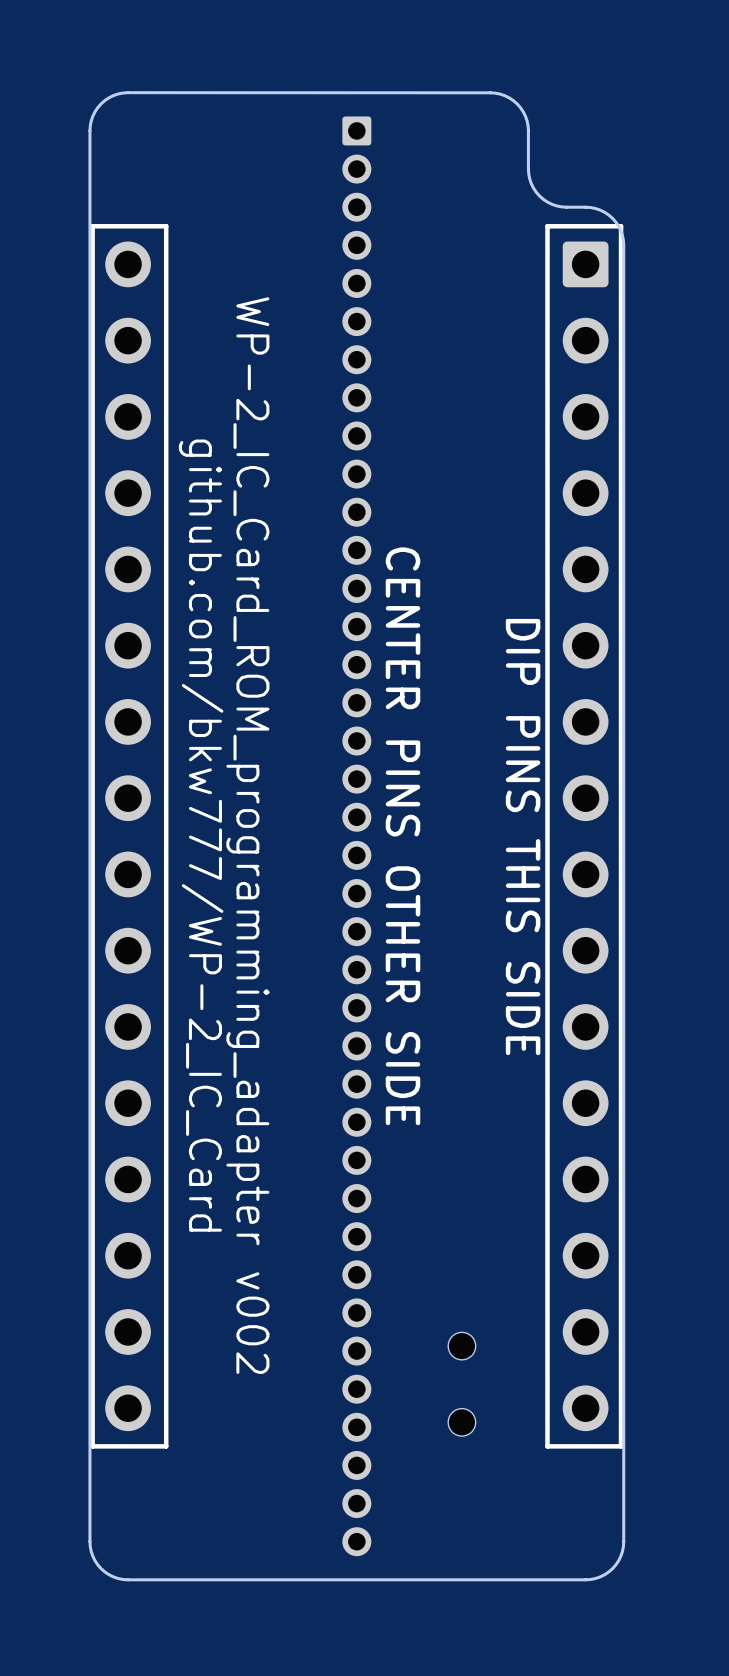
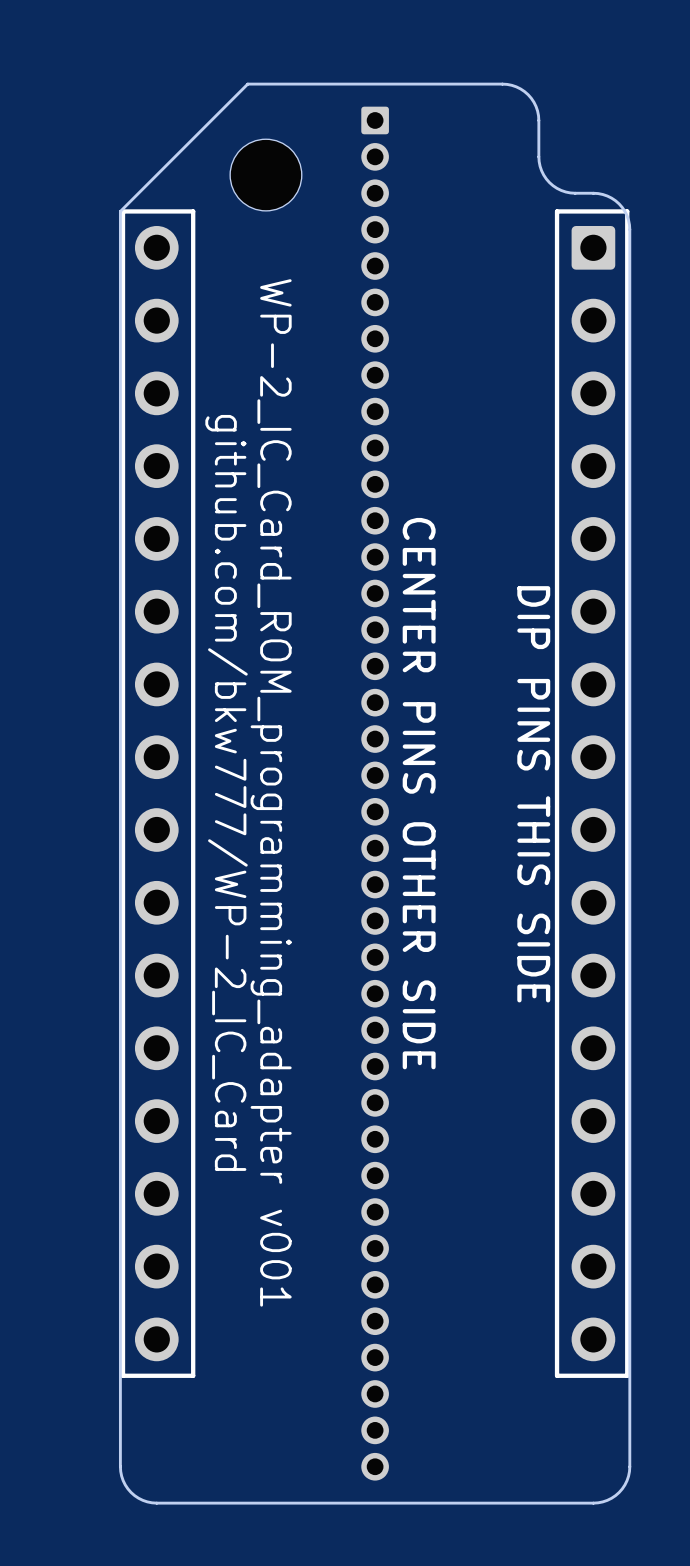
board edge: (128, 92) (490, 92) -> (120, 211) (247, 84) (502, 84)
board edge: (128, 92) (113, 95) (101, 103) (92, 116) (89, 130) -> none
board edge: (89, 130) (89, 226) -> none
part: none -> (265, 175)
text: WP-2_IC_Card_ROM_programming_adapter v002 (247, 835) -> WP-2_IC_Card_ROM_programming_adapter v001 (271, 792)
part: (461, 1384) -> none

